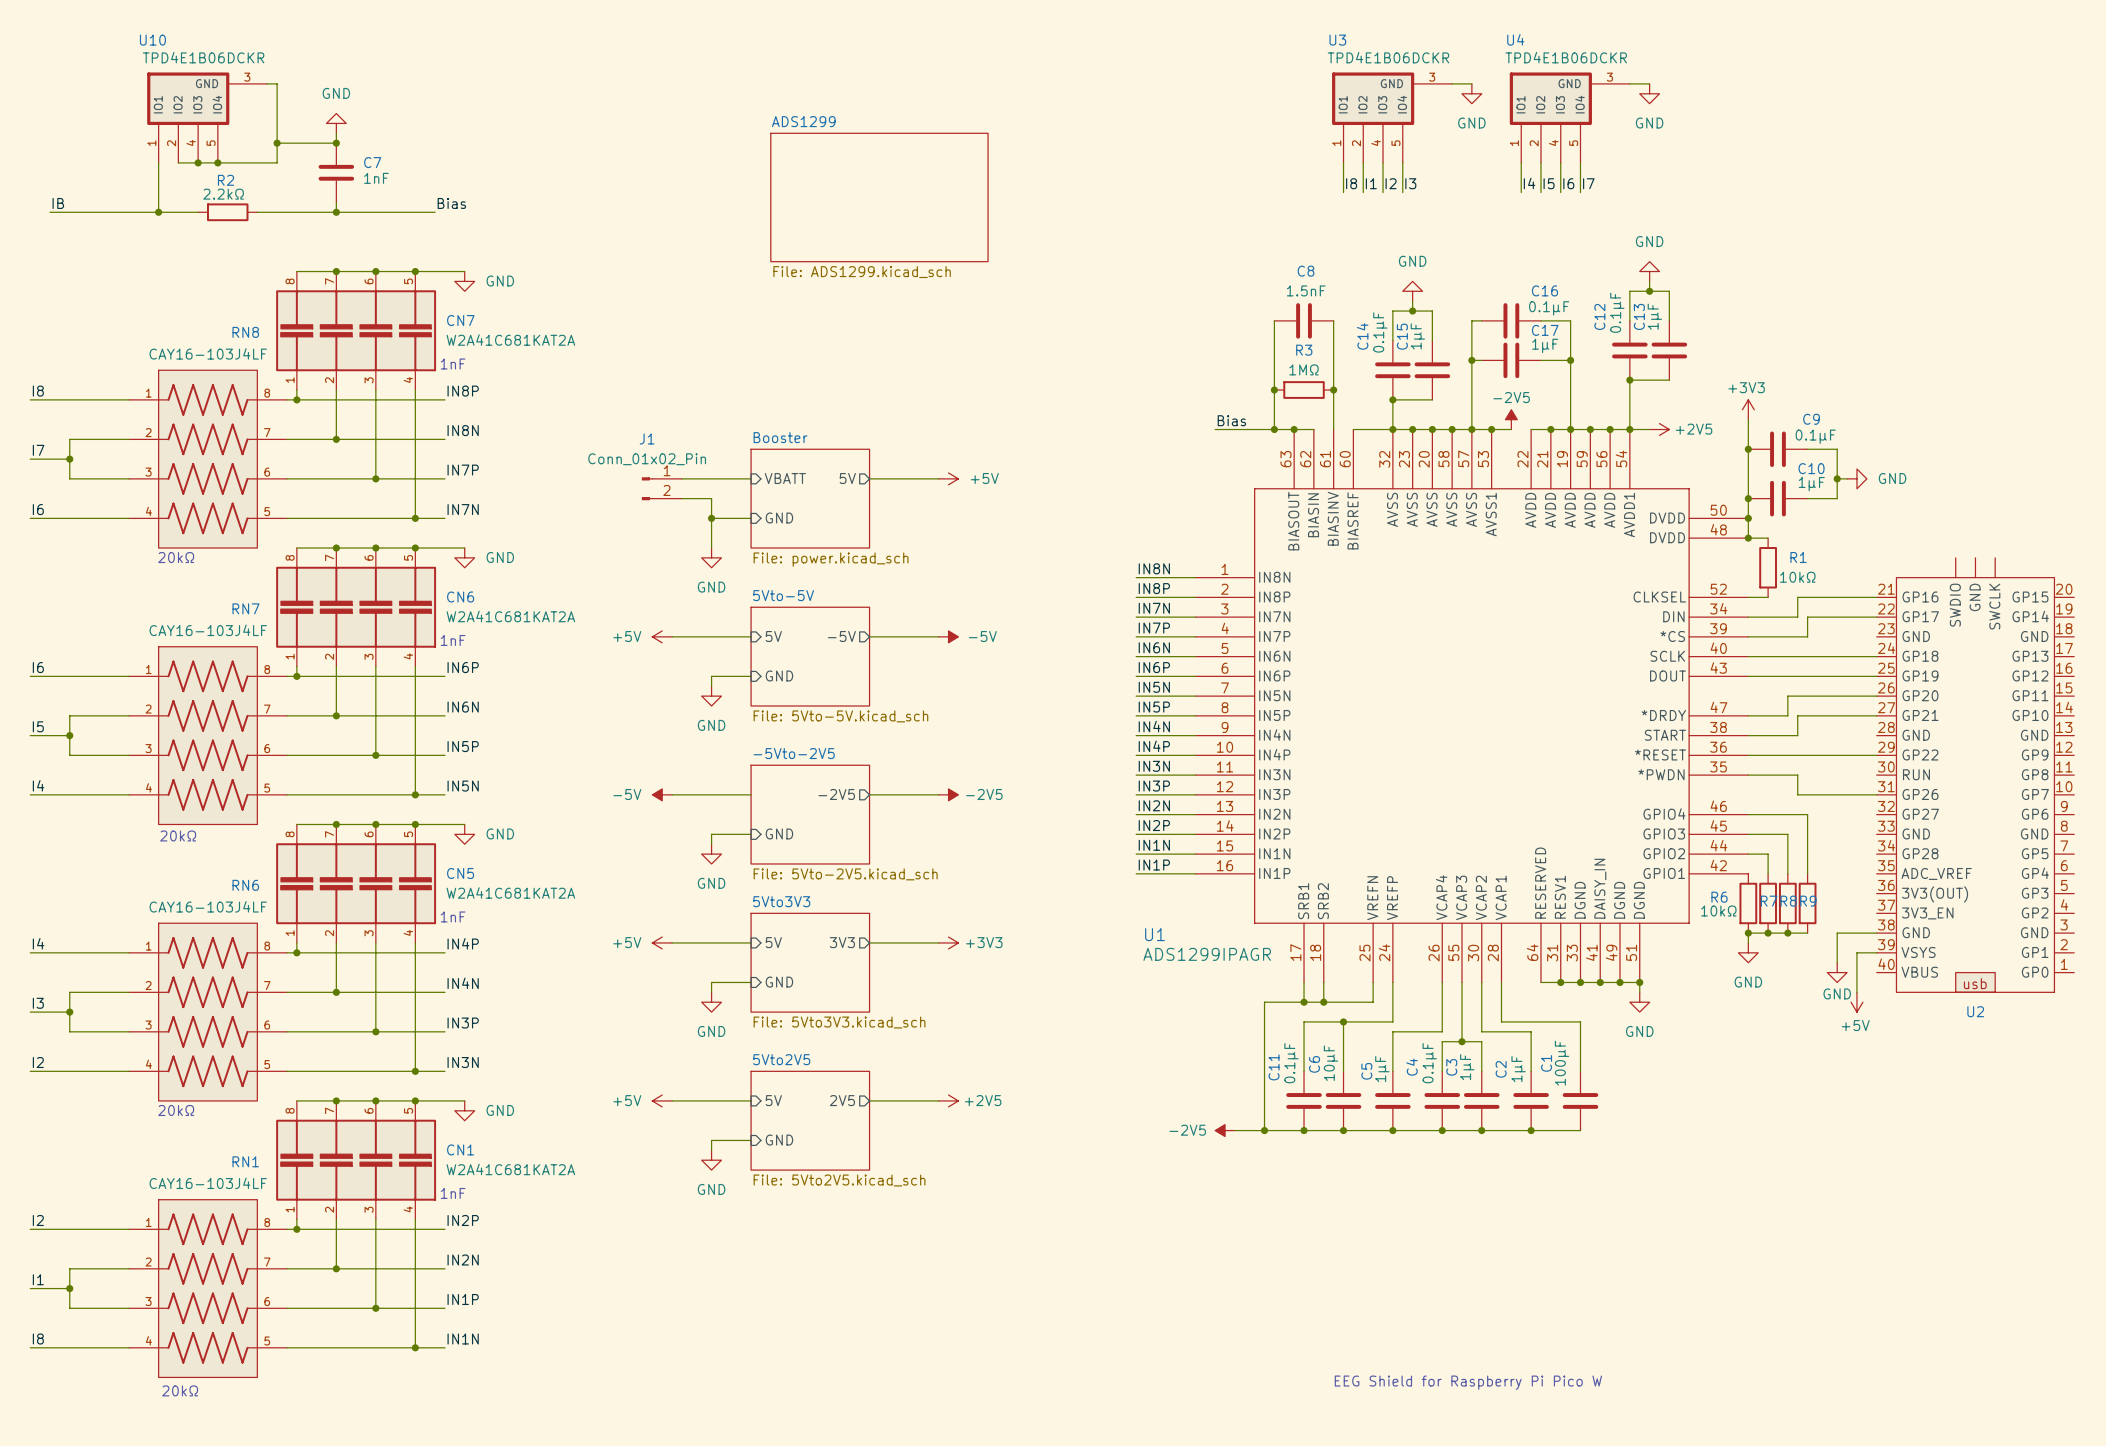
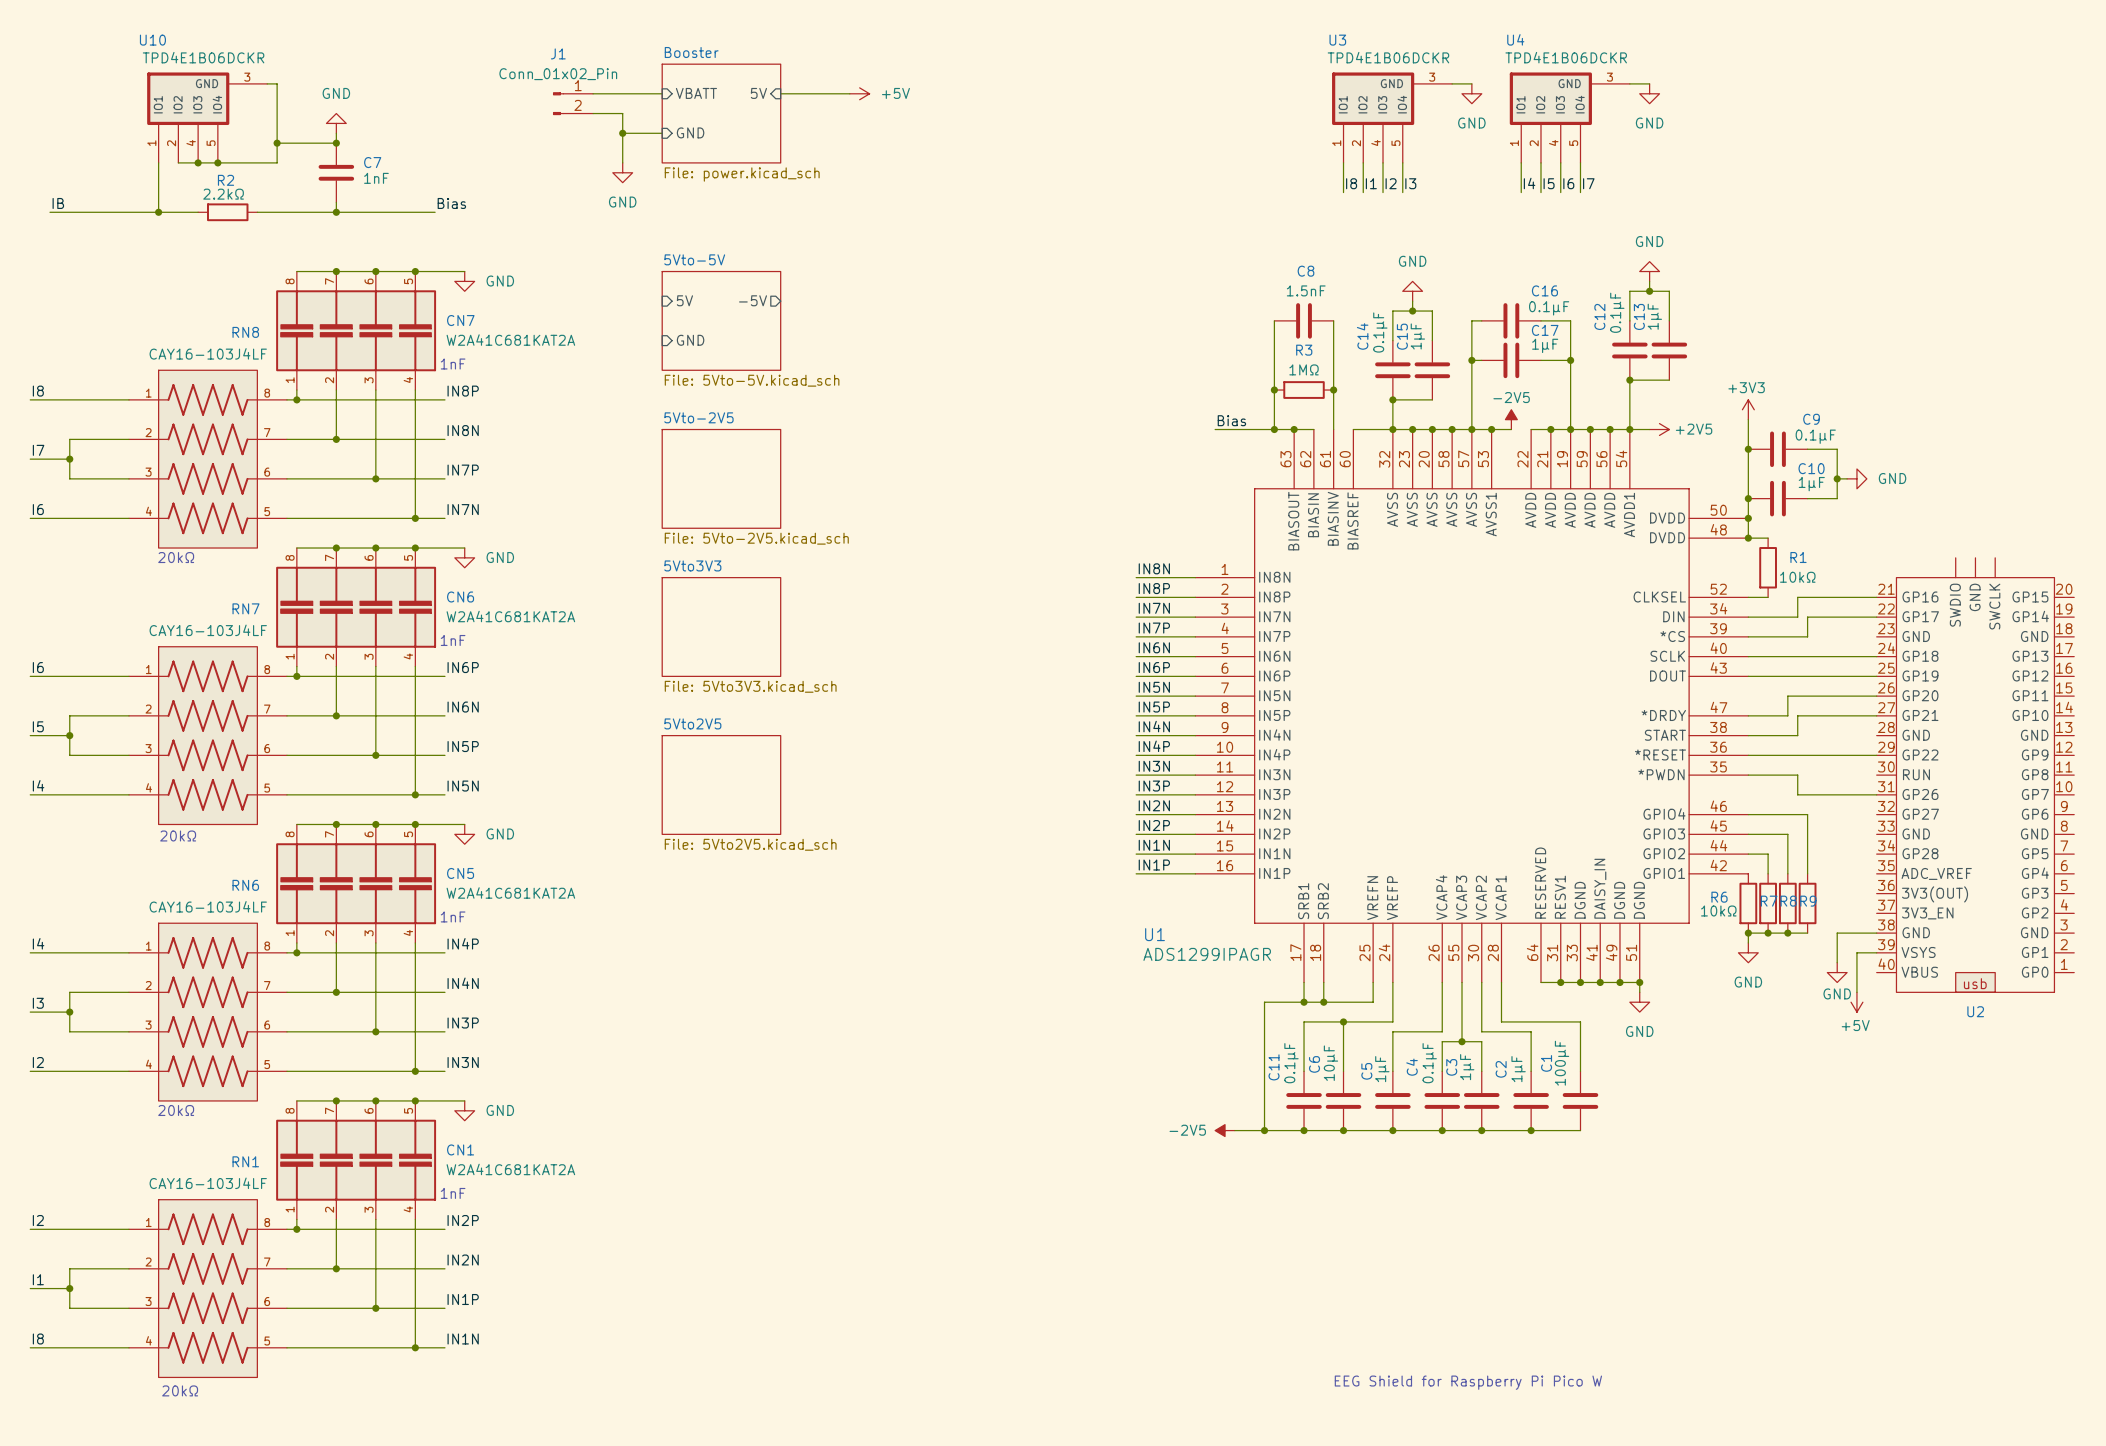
wire: none -> (593, 93) (662, 93)
sheet pin: none -> VBATT (696, 93)
sheet pin: none -> 5V (758, 93)
wire: none -> (780, 93) (849, 93)
power symbol: none -> +5V (859, 93)
wire: none -> (593, 113) (622, 113) (622, 162)
sheet Booster: none -> File: power.kicad_sch (721, 113)
sheet pin: none -> GND (690, 132)
wire: none -> (622, 133) (662, 133)
junction: none -> (622, 133)
power symbol: none -> GND (622, 172)
sheet ADS1299: File: ADS1299.kicad_sch (879, 197) -> none
sheet pin: none -> 5V (684, 300)
sheet pin: none -> -5V (753, 300)
sheet pin: none -> GND (690, 340)
wire: (681, 478) (751, 478) -> none
sheet 5Vto-2V5: none -> File: 5Vto-2V5.kicad_sch (721, 478)
sheet pin: VBATT (785, 478) -> none
sheet pin: 5V (847, 478) -> none
wire: (869, 478) (938, 478) -> none
power symbol: +5V (948, 478) -> none
J1 position: (661, 488) -> (573, 103)
wire: (681, 498) (711, 498) (711, 548) -> none
sheet Booster: File: power.kicad_sch (810, 498) -> none
wire: (711, 518) (751, 518) -> none
junction: (711, 518) -> none
sheet pin: GND (779, 518) -> none
power symbol: GND (711, 557) -> none
power symbol: +5V (662, 636) -> none
wire: (672, 636) (751, 636) -> none
sheet pin: 5V (773, 636) -> none
sheet pin: -5V (841, 636) -> none
wire: (869, 636) (938, 636) -> none
power symbol: -5V (948, 636) -> none
sheet 5Vto-5V position: (810, 656) -> (721, 320)
sheet pin: GND (779, 676) -> none
power symbol: GND (711, 696) -> none
power symbol: -5V (662, 794) -> none
wire: (672, 794) (751, 794) -> none
sheet pin: -2V5 (836, 794) -> none
wire: (869, 794) (938, 794) -> none
power symbol: -2V5 (948, 794) -> none
sheet -5Vto-2V5: File: 5Vto-2V5.kicad_sch (810, 814) -> none
sheet pin: GND (779, 833) -> none
power symbol: GND (711, 854) -> none
power symbol: +5V (662, 942) -> none
wire: (672, 942) (751, 942) -> none
sheet pin: 5V (773, 942) -> none
sheet pin: 3V3 (842, 942) -> none
wire: (869, 942) (938, 942) -> none
power symbol: +3V3 (948, 942) -> none
sheet 5Vto3V3 position: (810, 962) -> (721, 627)
wire: (751, 982) (711, 982) (711, 992) -> none
sheet pin: GND (779, 982) -> none
power symbol: GND (711, 1002) -> none
power symbol: +5V (662, 1100) -> none
wire: (672, 1100) (751, 1100) -> none
sheet pin: 5V (773, 1100) -> none
sheet pin: 2V5 (842, 1100) -> none
wire: (869, 1100) (938, 1100) -> none
power symbol: +2V5 (948, 1100) -> none
sheet 5Vto2V5 position: (810, 1120) -> (721, 784)
wire: (751, 1140) (711, 1140) (711, 1150) -> none
sheet pin: GND (779, 1140) -> none
power symbol: GND (711, 1160) -> none

